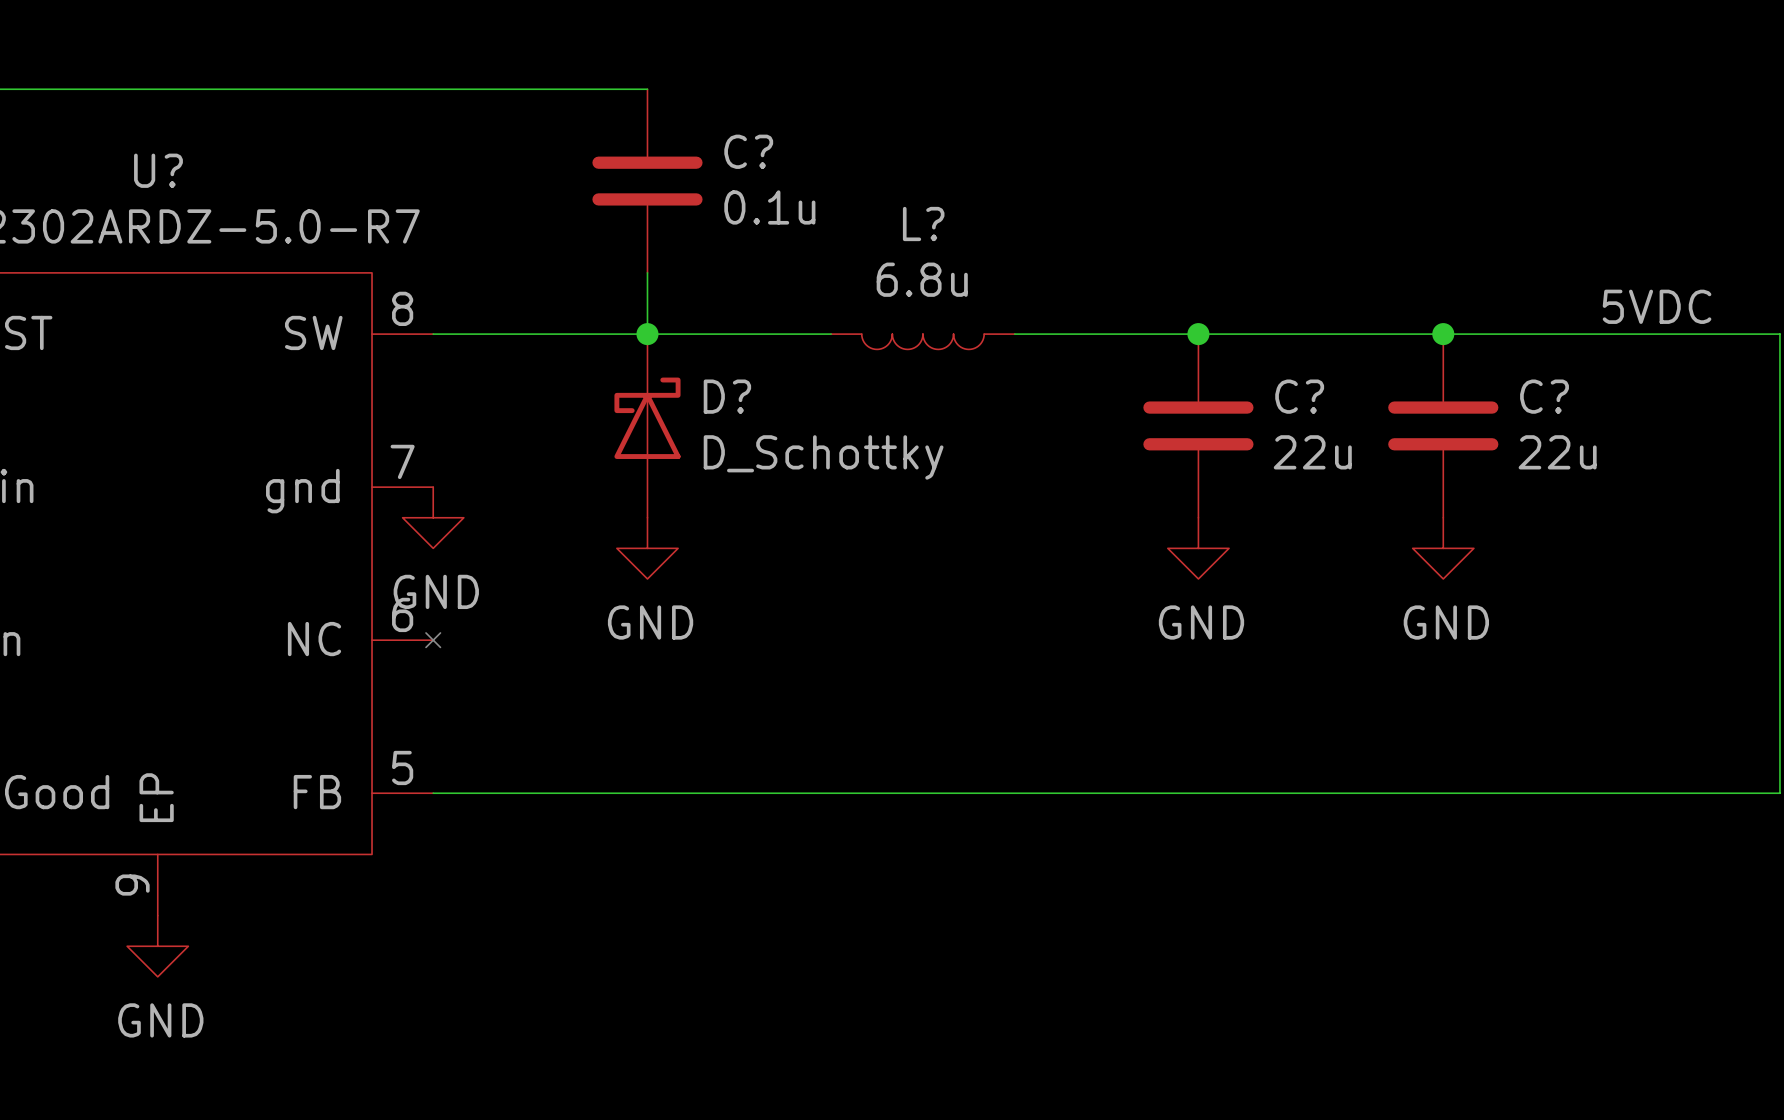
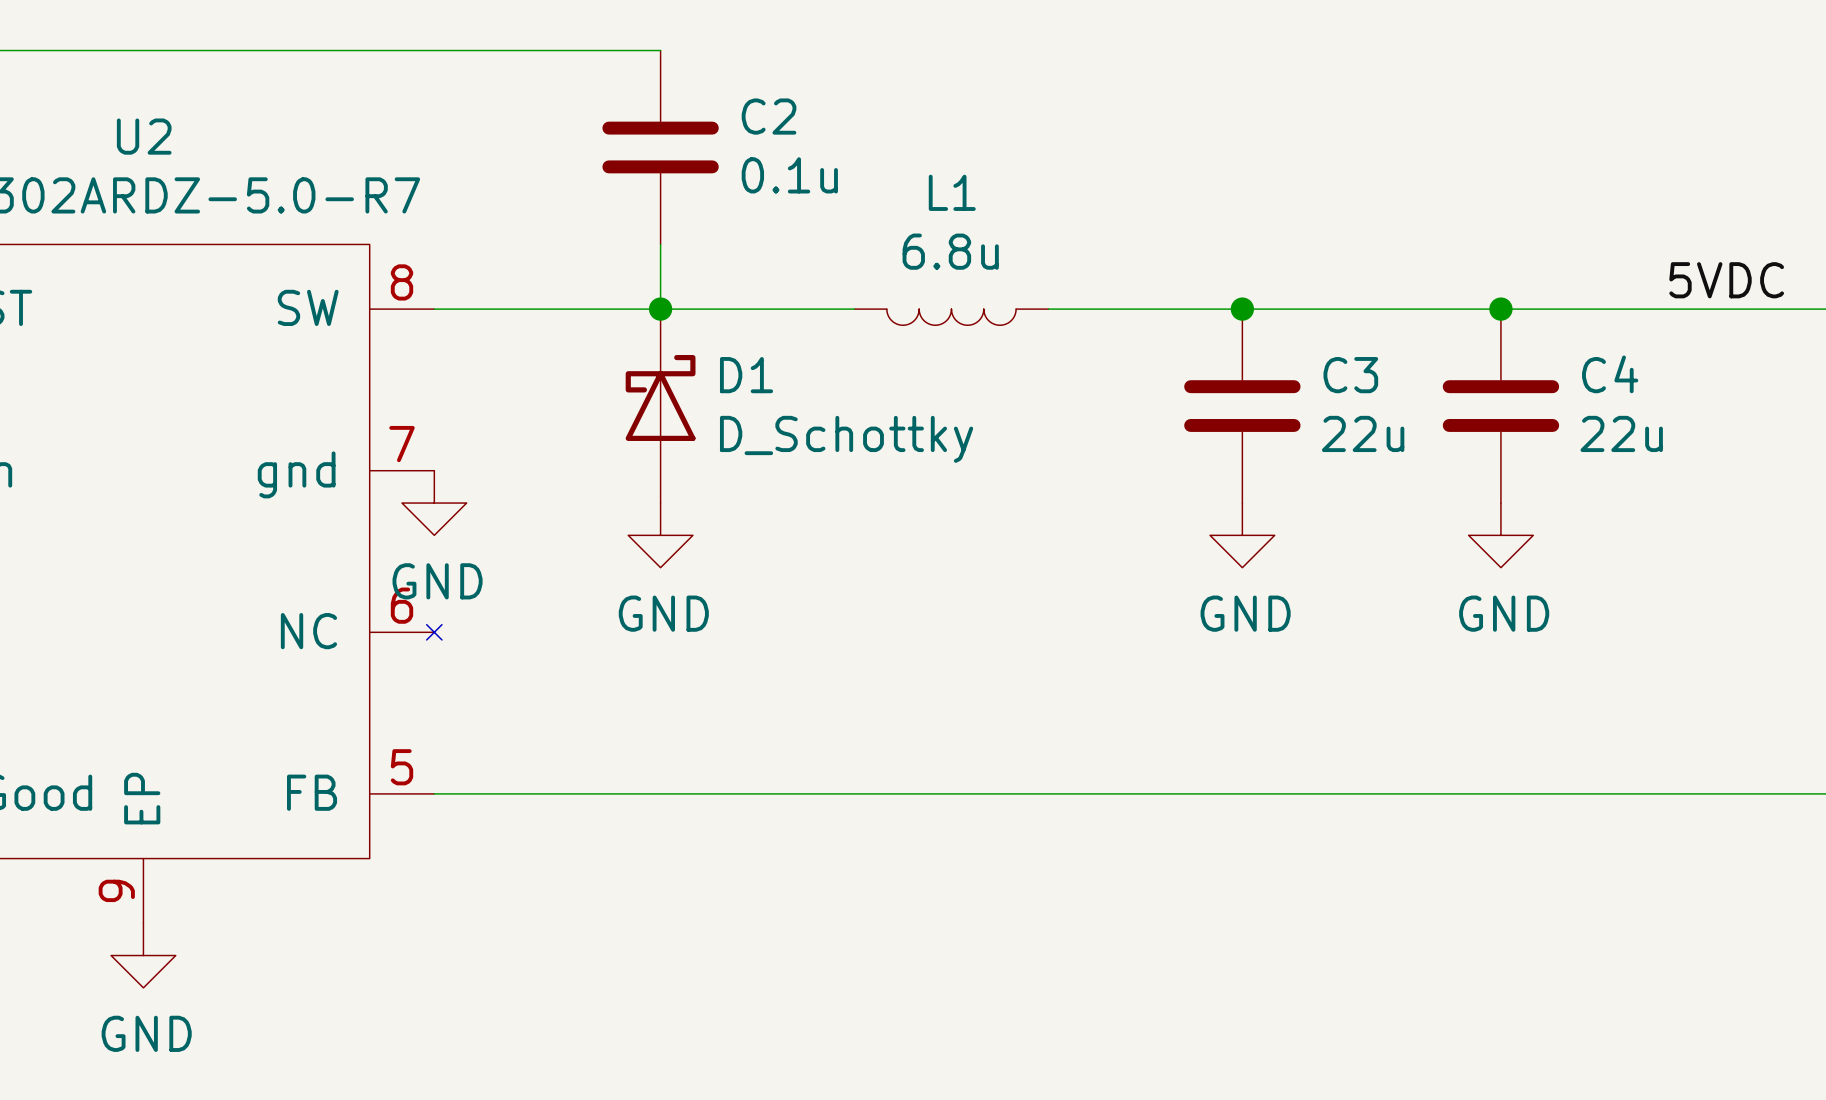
C? name: C? (748, 151) -> C2 (769, 116)
U? name: U? (158, 170) -> U2 (144, 136)
L? name: L? (923, 223) -> L1 (952, 192)
D? name: D? (727, 396) -> D1 (746, 375)
C? name: C? (1299, 396) -> C3 (1350, 375)
C? name: C? (1544, 396) -> C4 (1610, 374)

